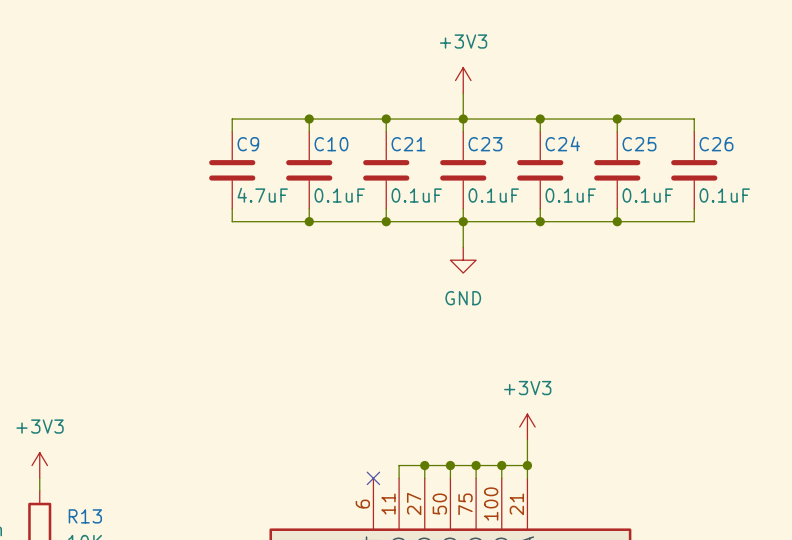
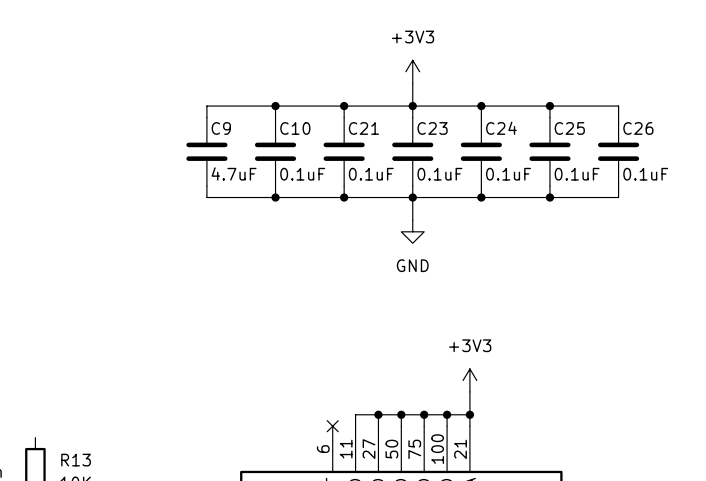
power symbol: +3V3 (39, 465) -> none
wire: (39, 478) (39, 491) -> none

